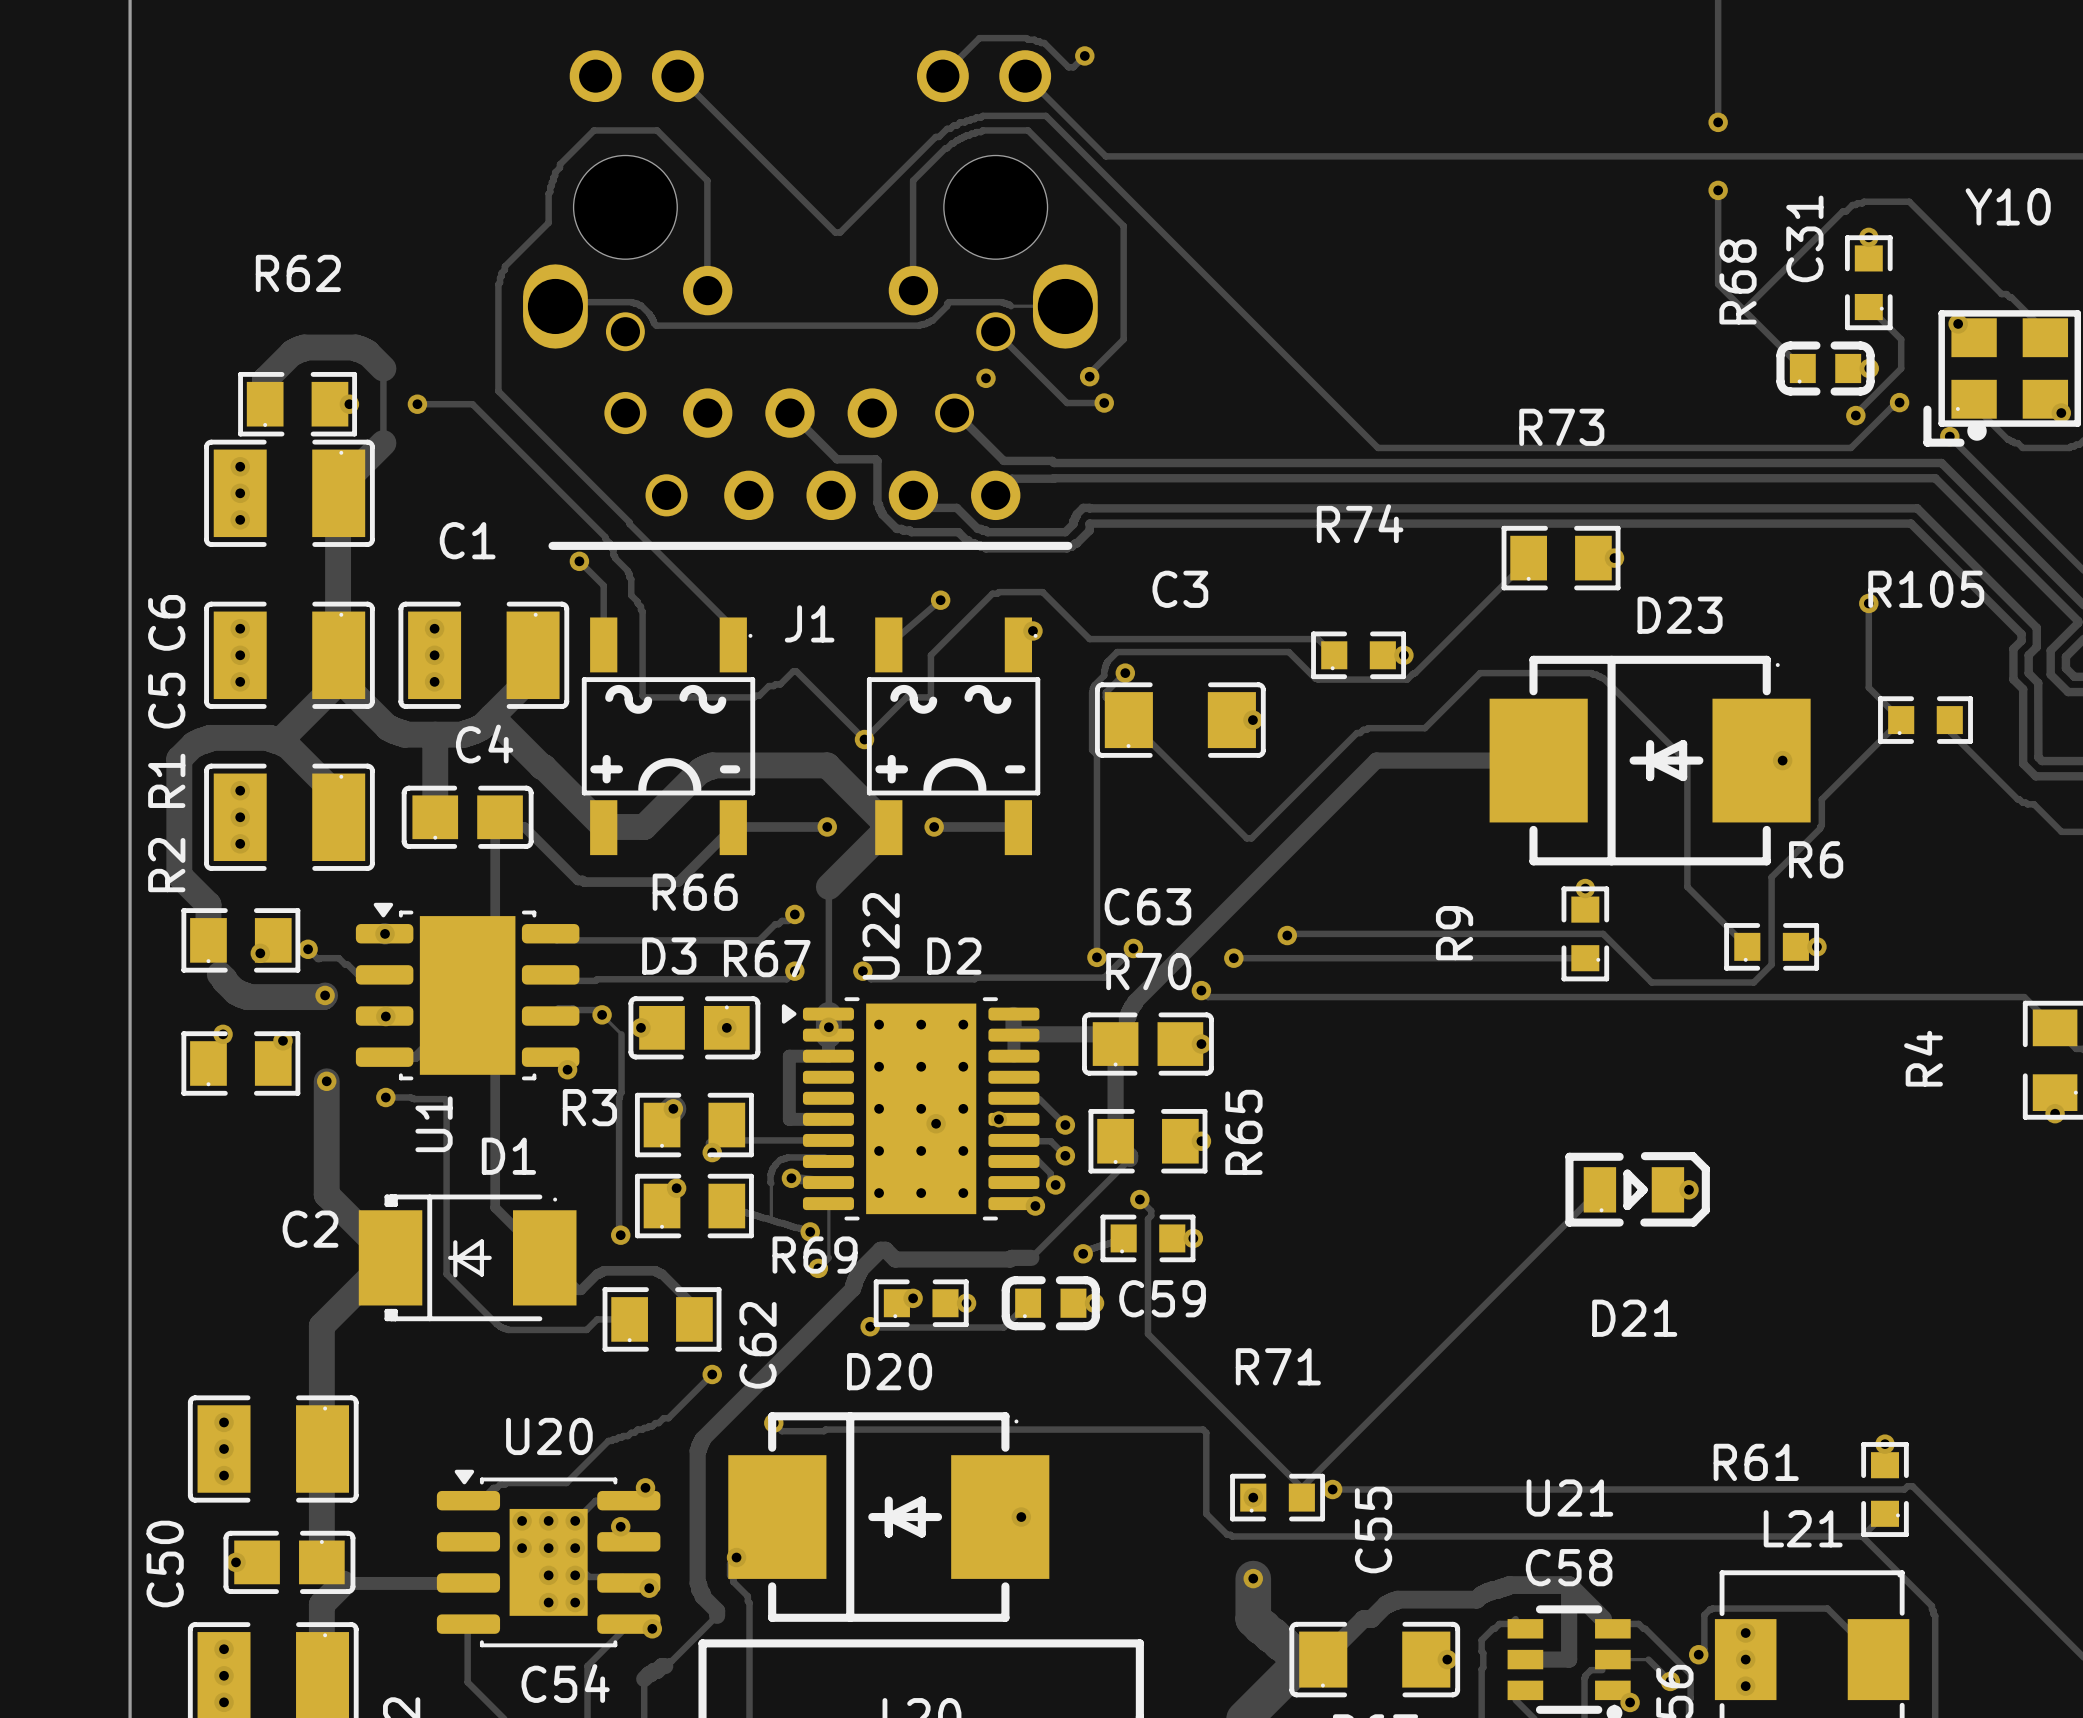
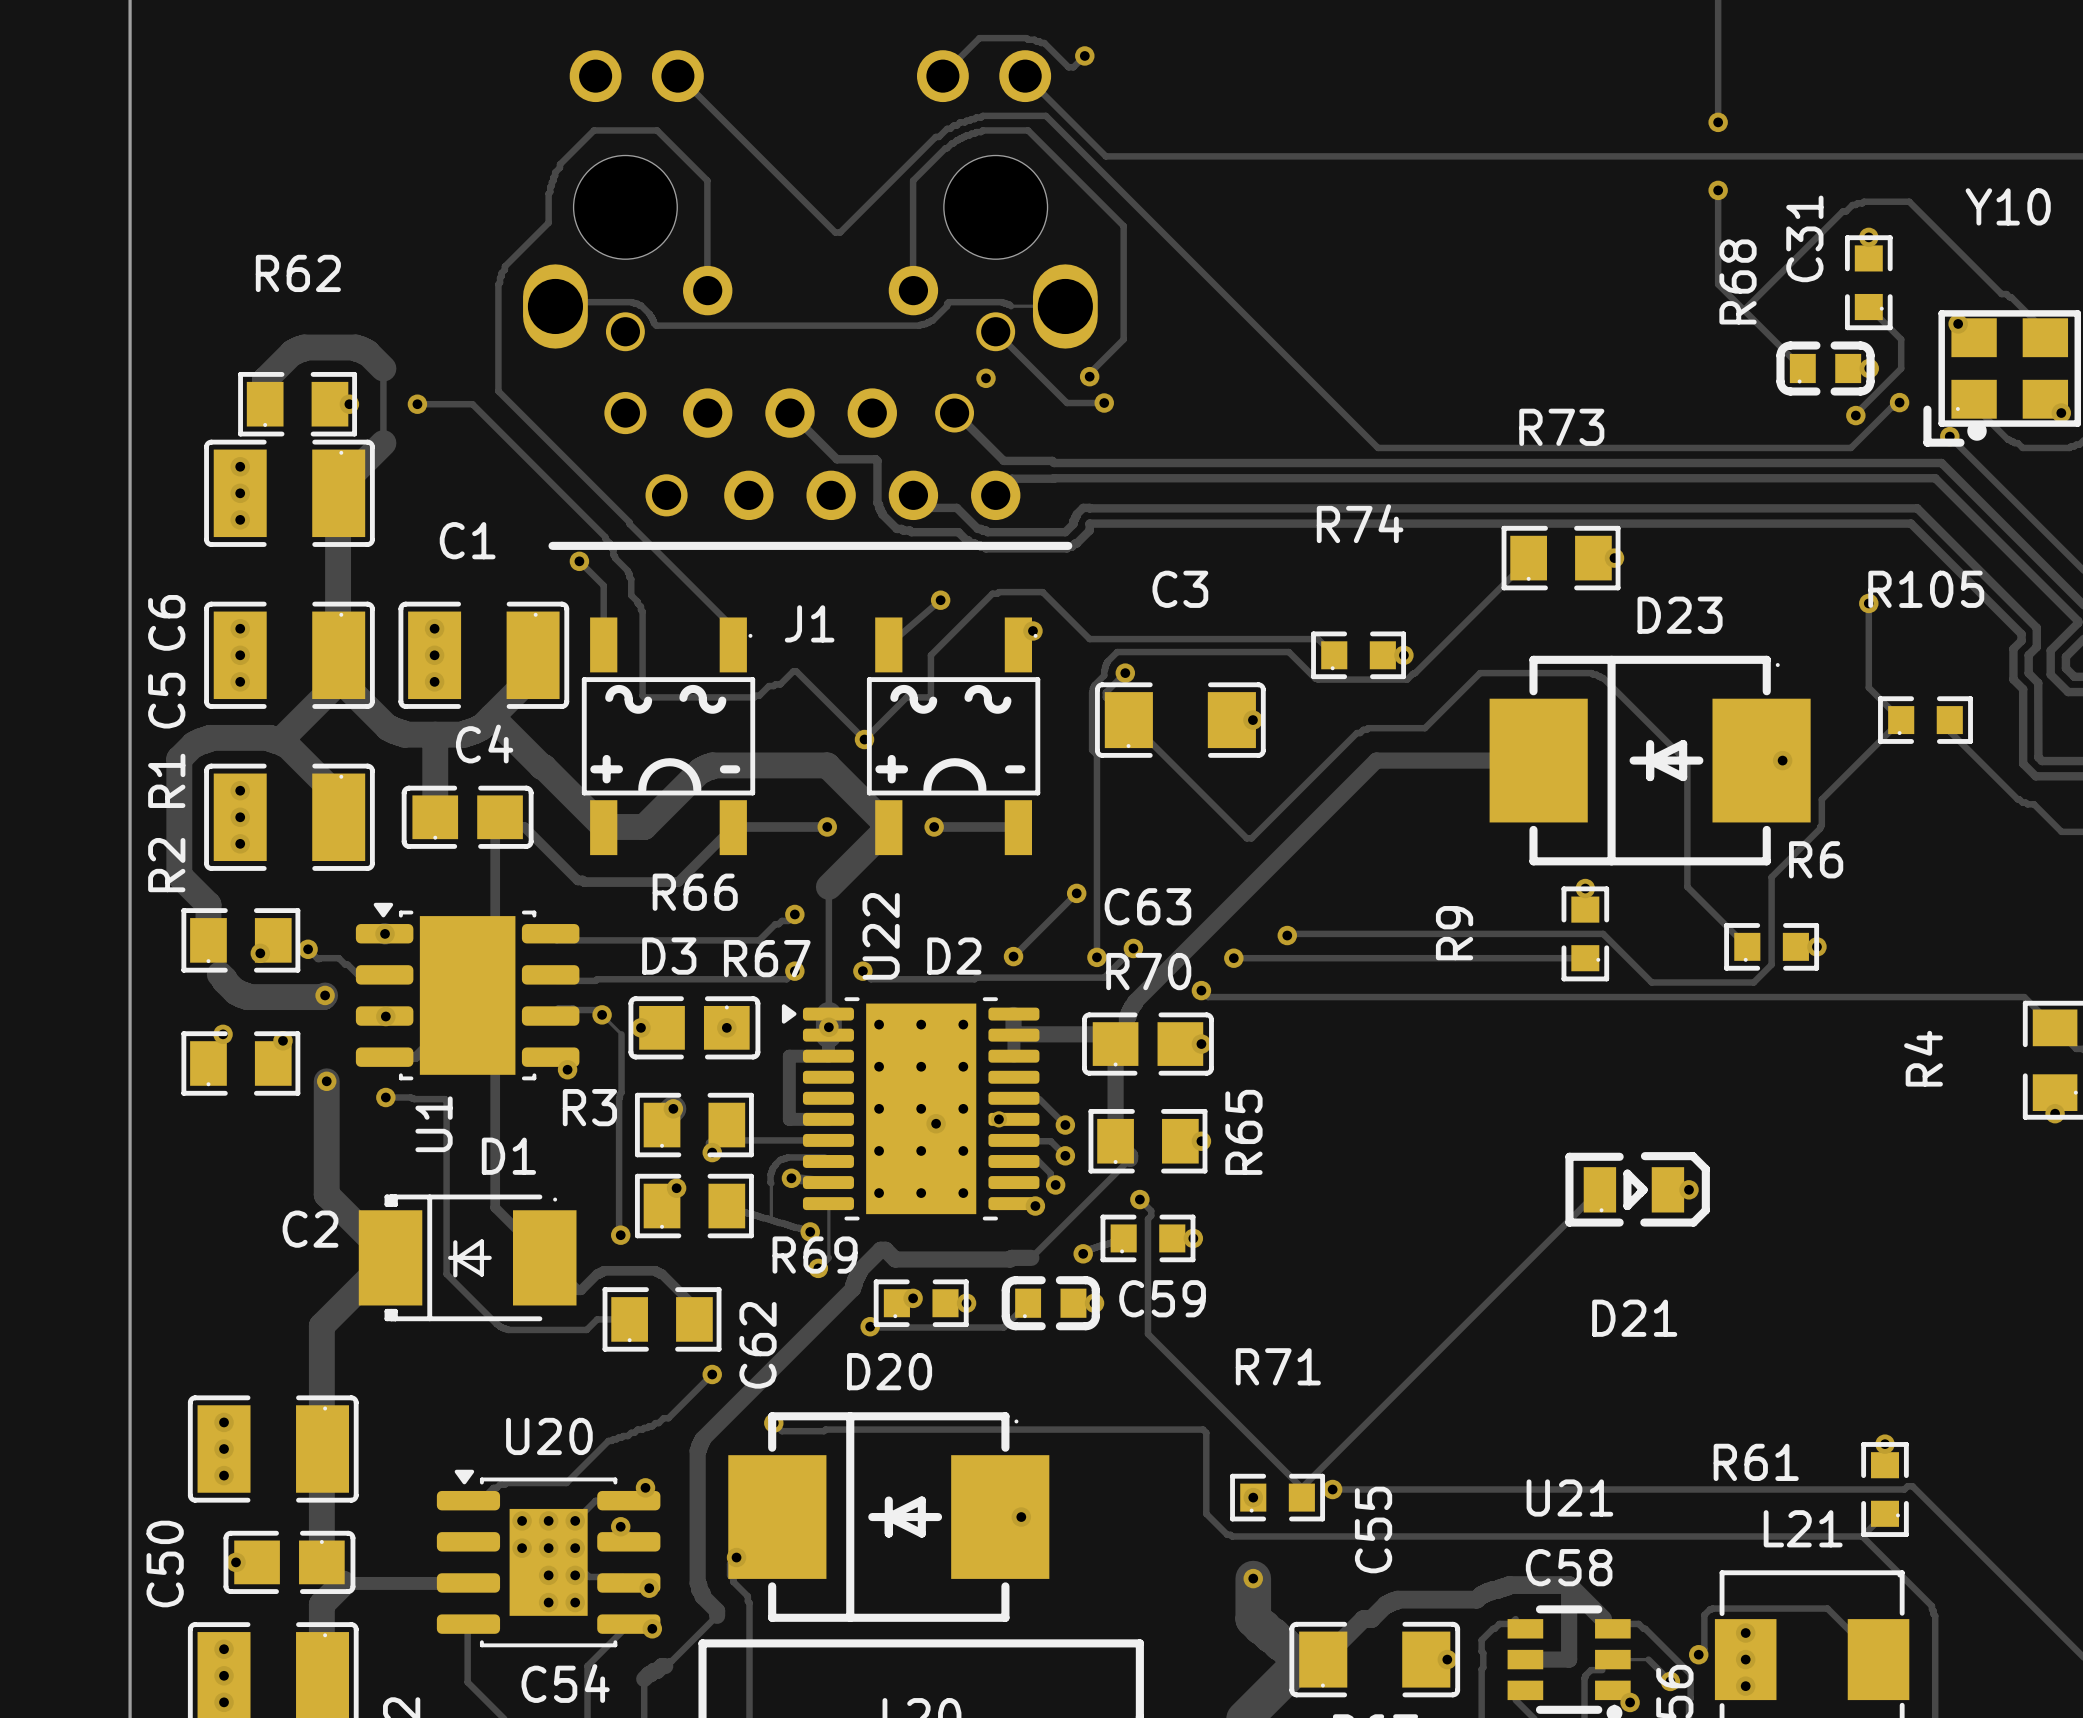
track: none -> (1076, 893) (1013, 956)
via: none -> (1076, 893)
via: none -> (1013, 956)

